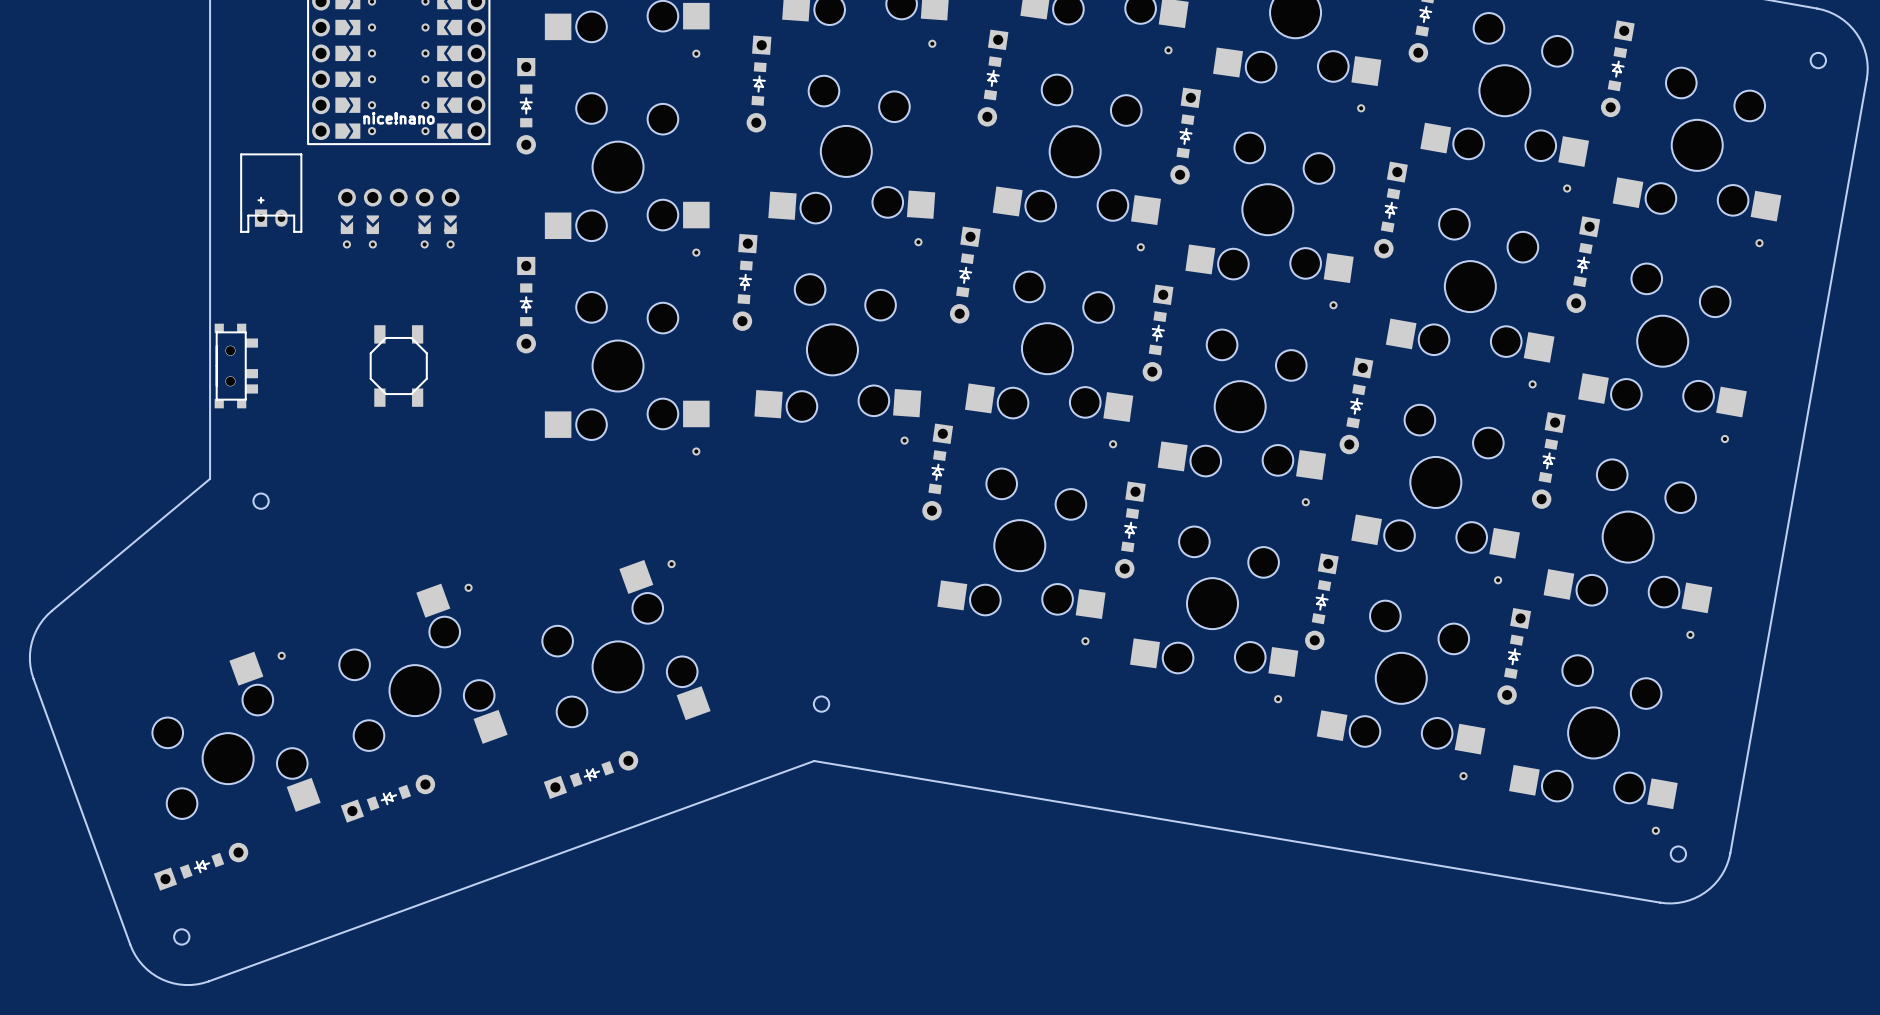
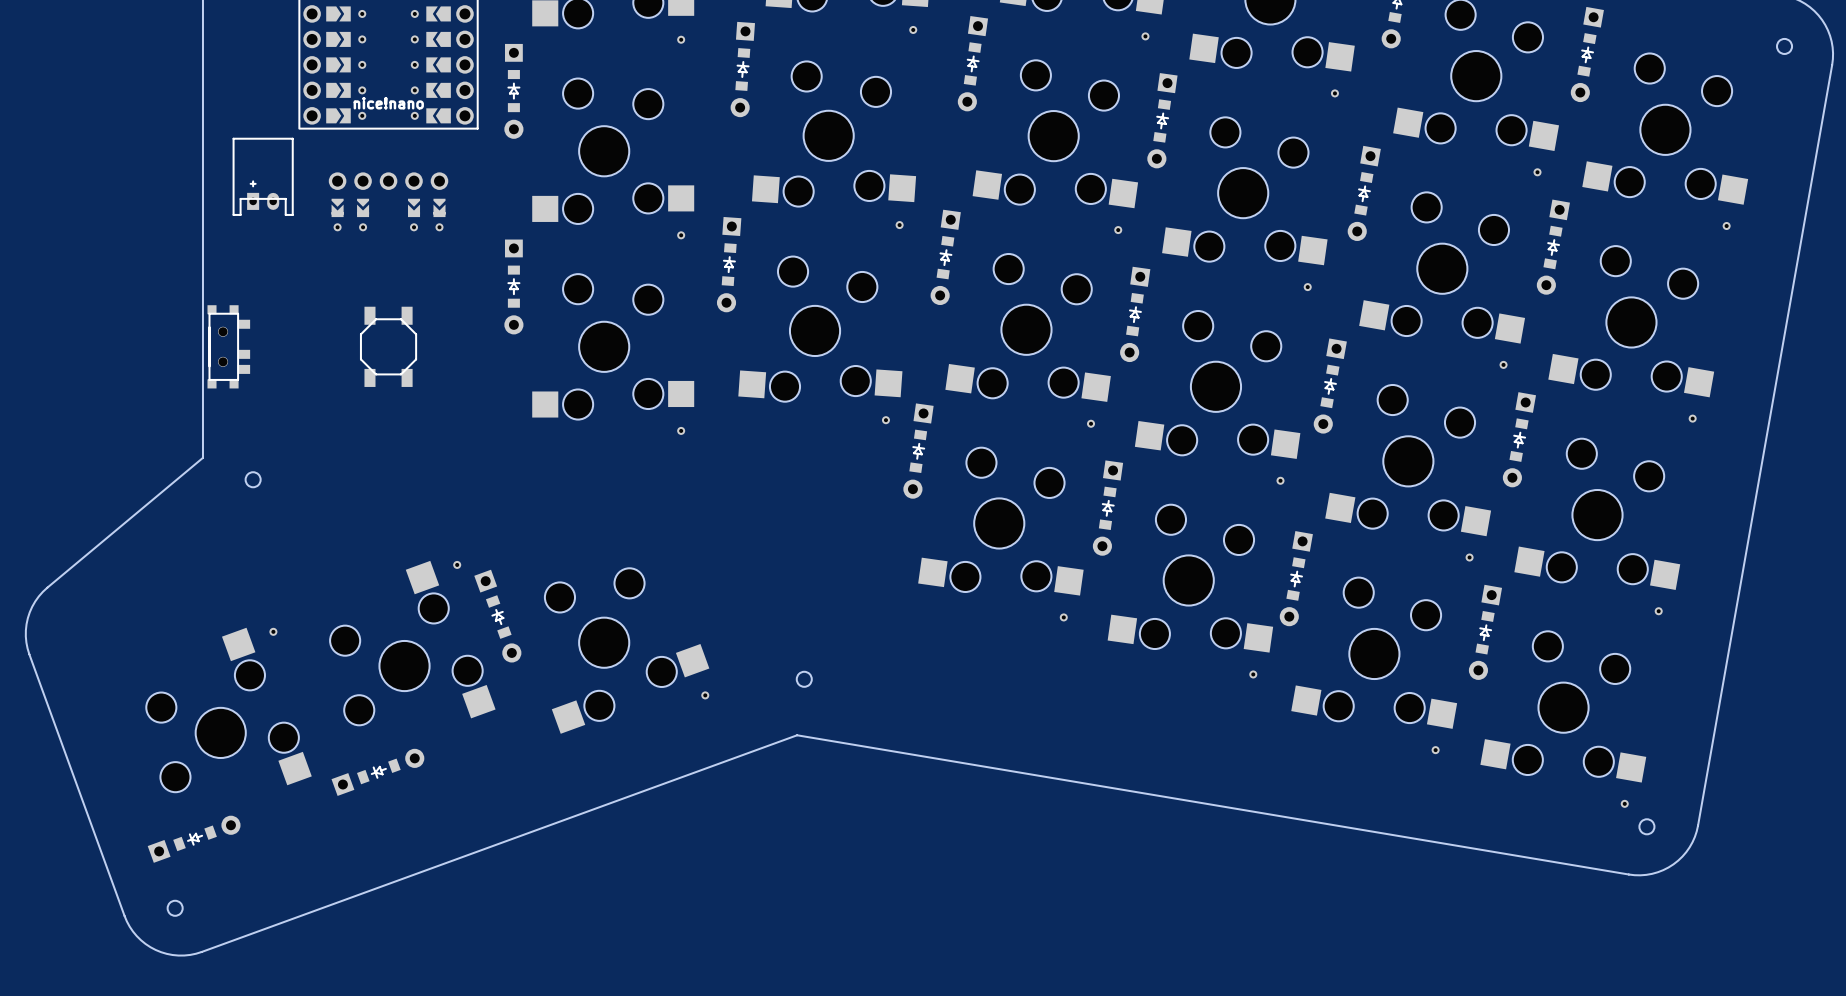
part rotation: 0° (626, 643) -> 90° clockwise (627, 651)
part rotation: 0° (590, 775) -> 90° clockwise (497, 616)
part position: (590, 775) -> (497, 616)

